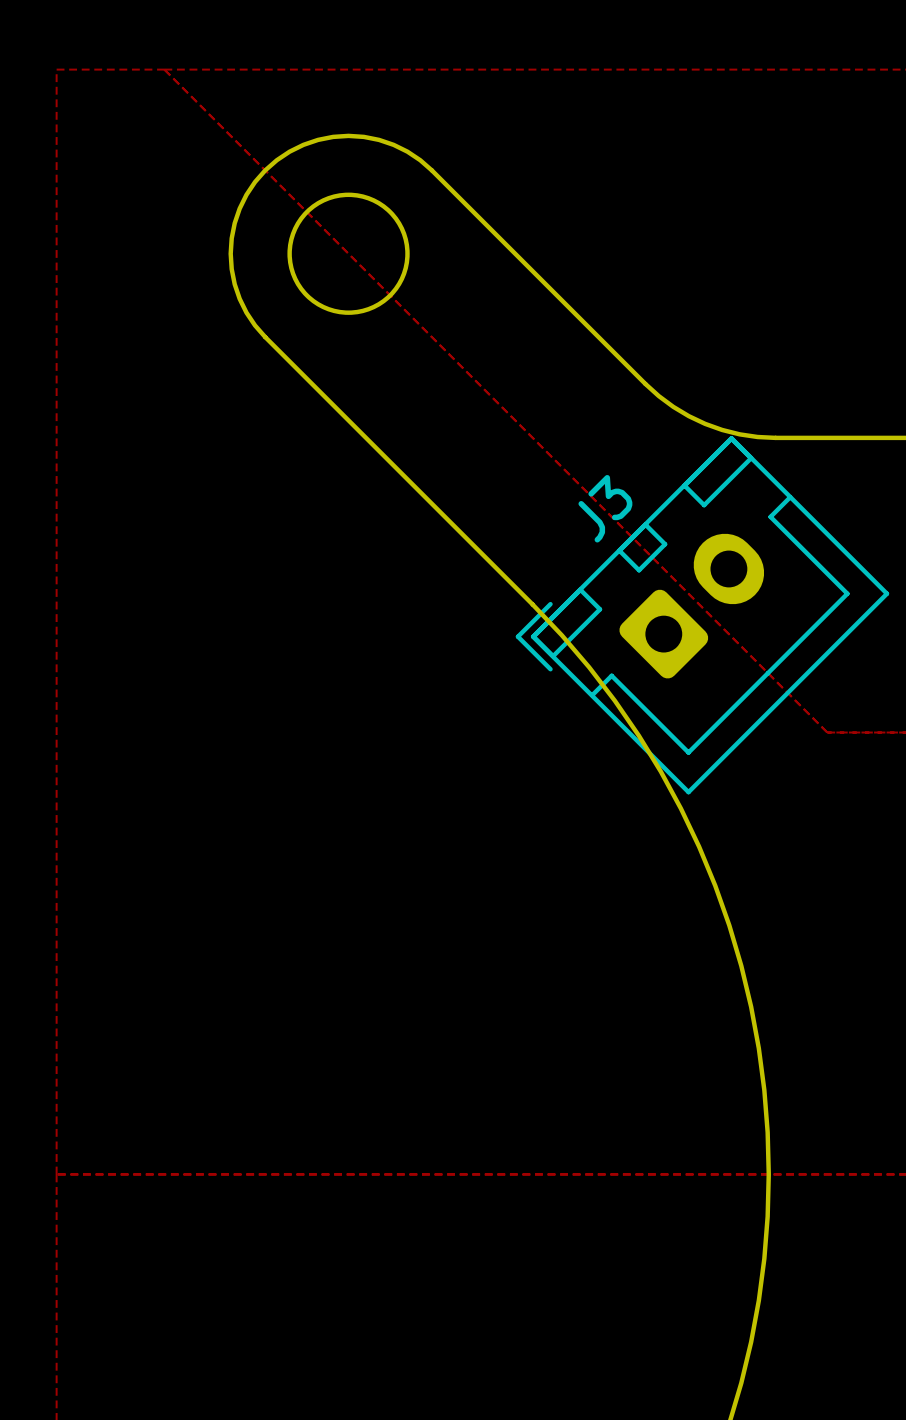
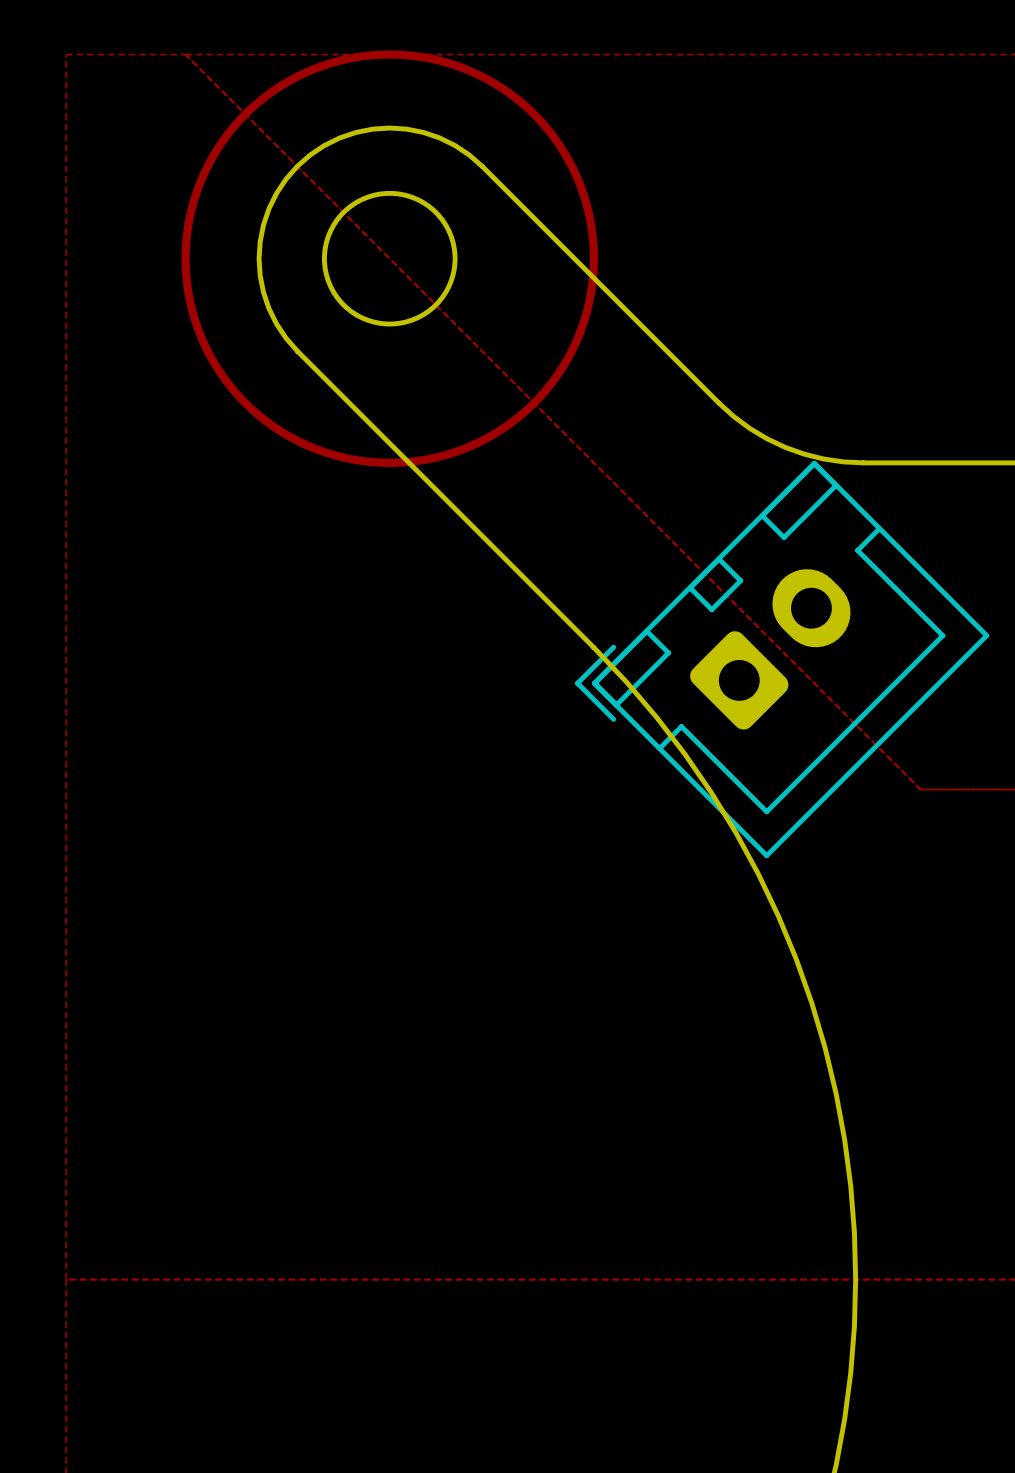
drawing: none -> [181, 50, 599, 467]
J3 name: J3 (605, 508) -> none

